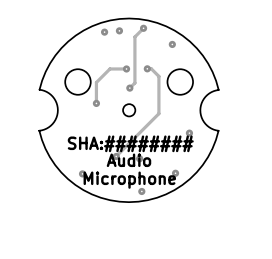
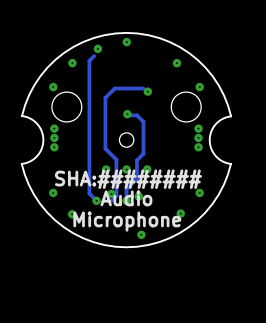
via: none -> (126, 42)
track: (143, 28) (134, 36) (134, 83) (129, 88) -> none
via: (143, 28) -> none
via: (119, 30) -> none
track: none -> (94, 56) (89, 60) (89, 193) (96, 200)
via: none -> (72, 63)
via: none -> (53, 87)
via: none -> (199, 87)
track: none -> (143, 88) (114, 88) (105, 97) (105, 148) (116, 159) (116, 195) (111, 200)
track: (126, 68) (109, 68) (96, 82) (96, 103) -> none
via: (126, 68) -> none
track: (147, 68) (151, 68) (158, 76) (158, 113) (116, 156) -> none
track: none -> (126, 115) (136, 115) (143, 121) (143, 153) (136, 160) (136, 178) (126, 189) (126, 200)
via: none -> (54, 128)
via: none -> (198, 128)
via: (96, 103) -> none
via: none -> (54, 137)
via: none -> (198, 137)
via: none -> (54, 147)
via: none -> (198, 147)
via: (189, 133) -> none
via: none -> (106, 169)
via: none -> (126, 169)
via: none -> (147, 169)
via: none -> (53, 192)
via: none -> (199, 192)
via: none -> (96, 200)
via: none -> (126, 200)

